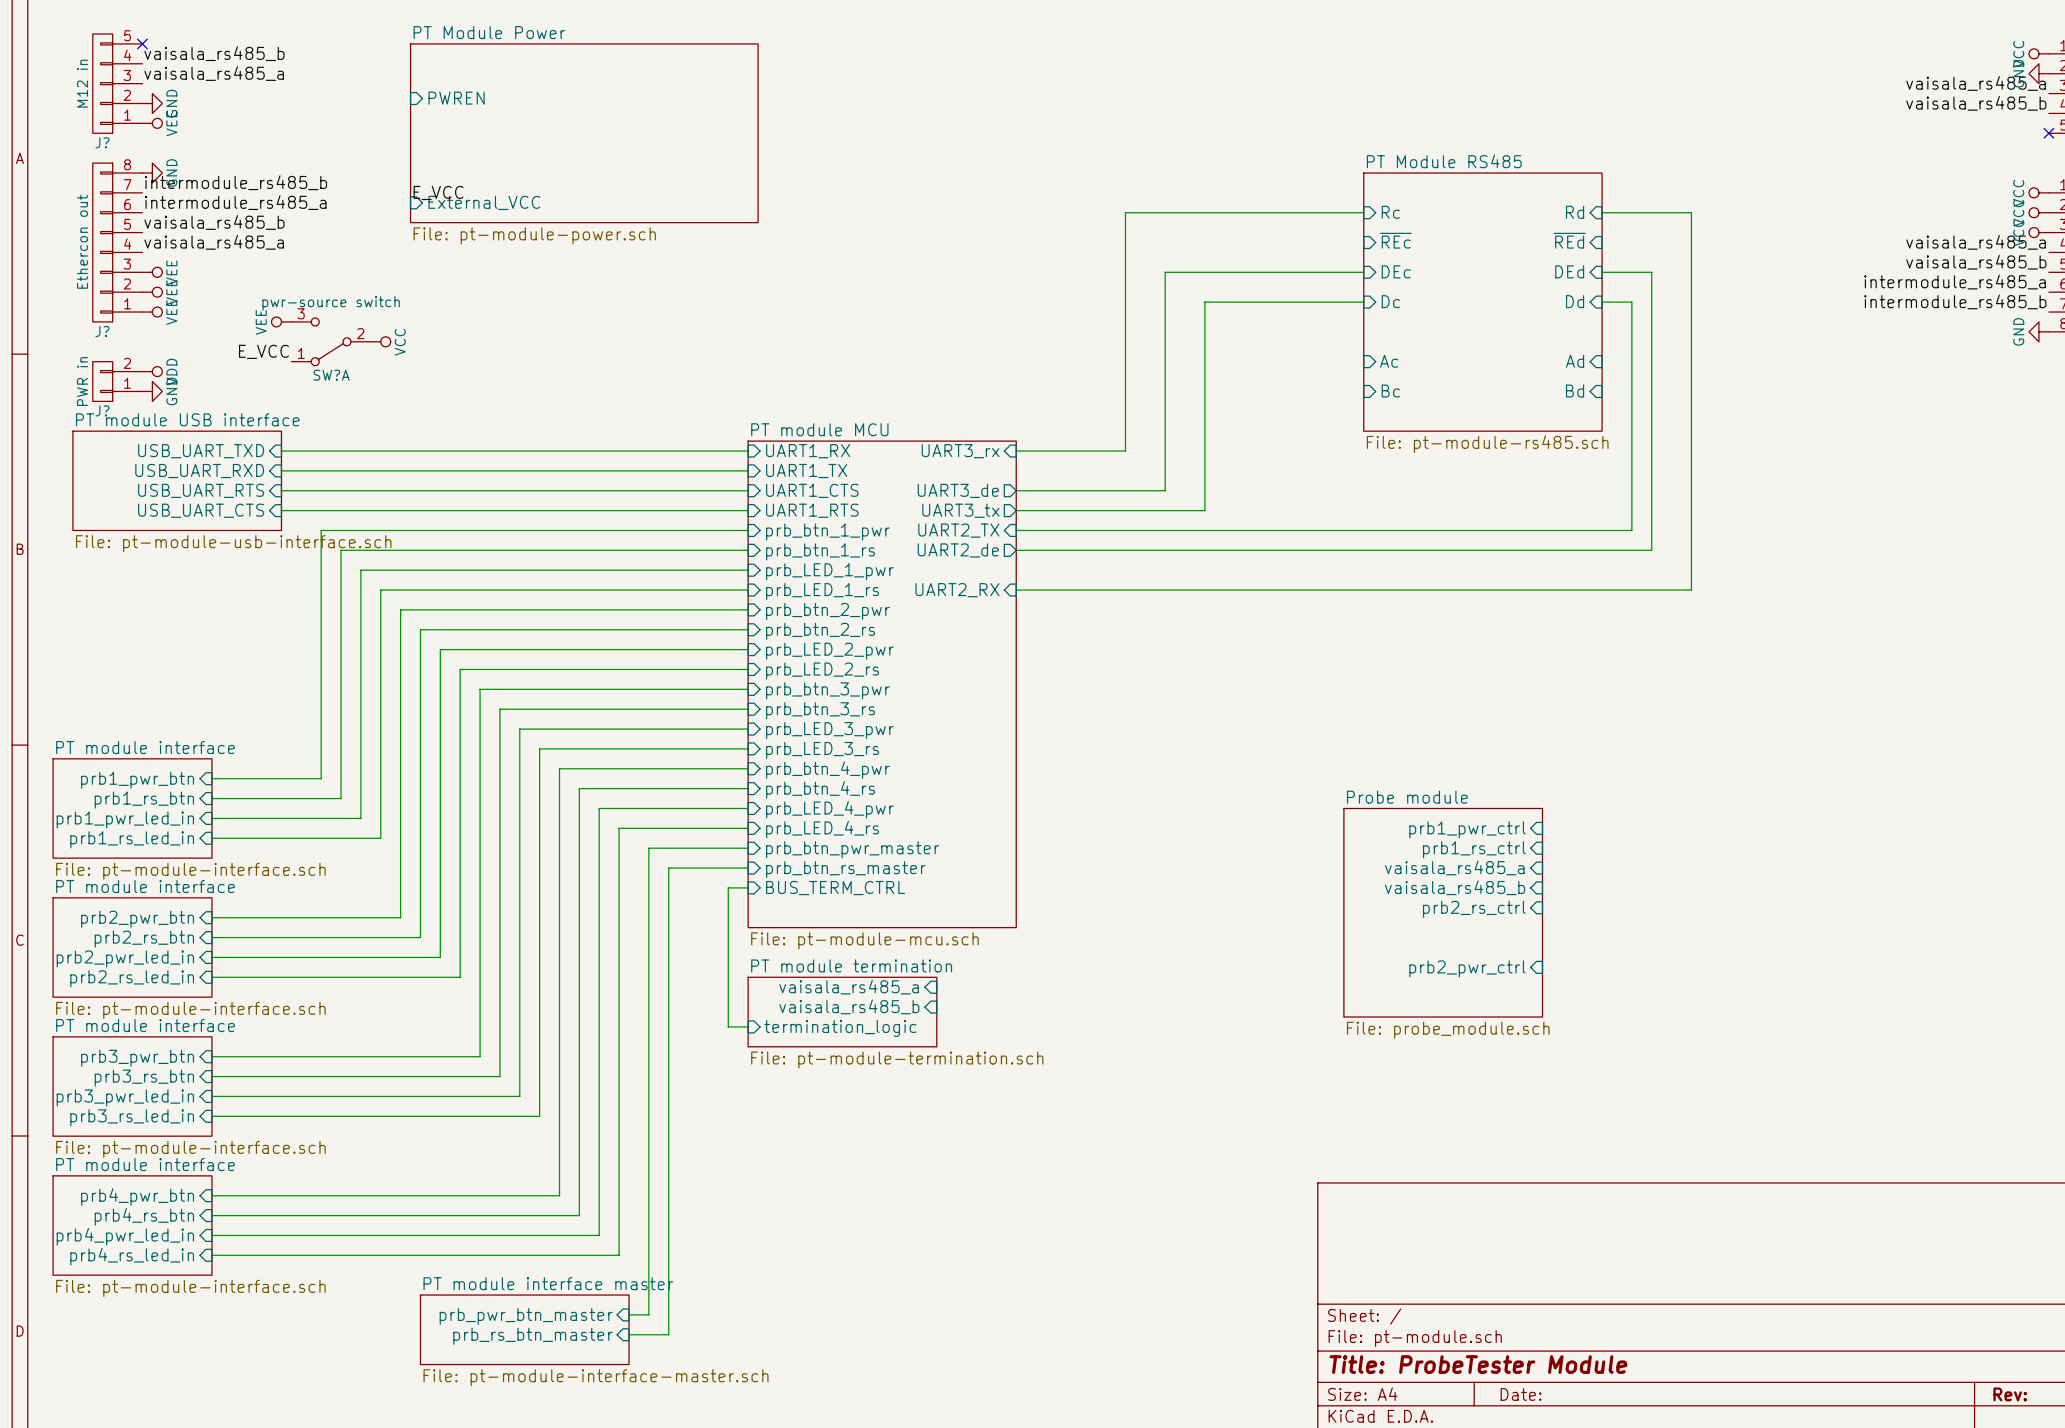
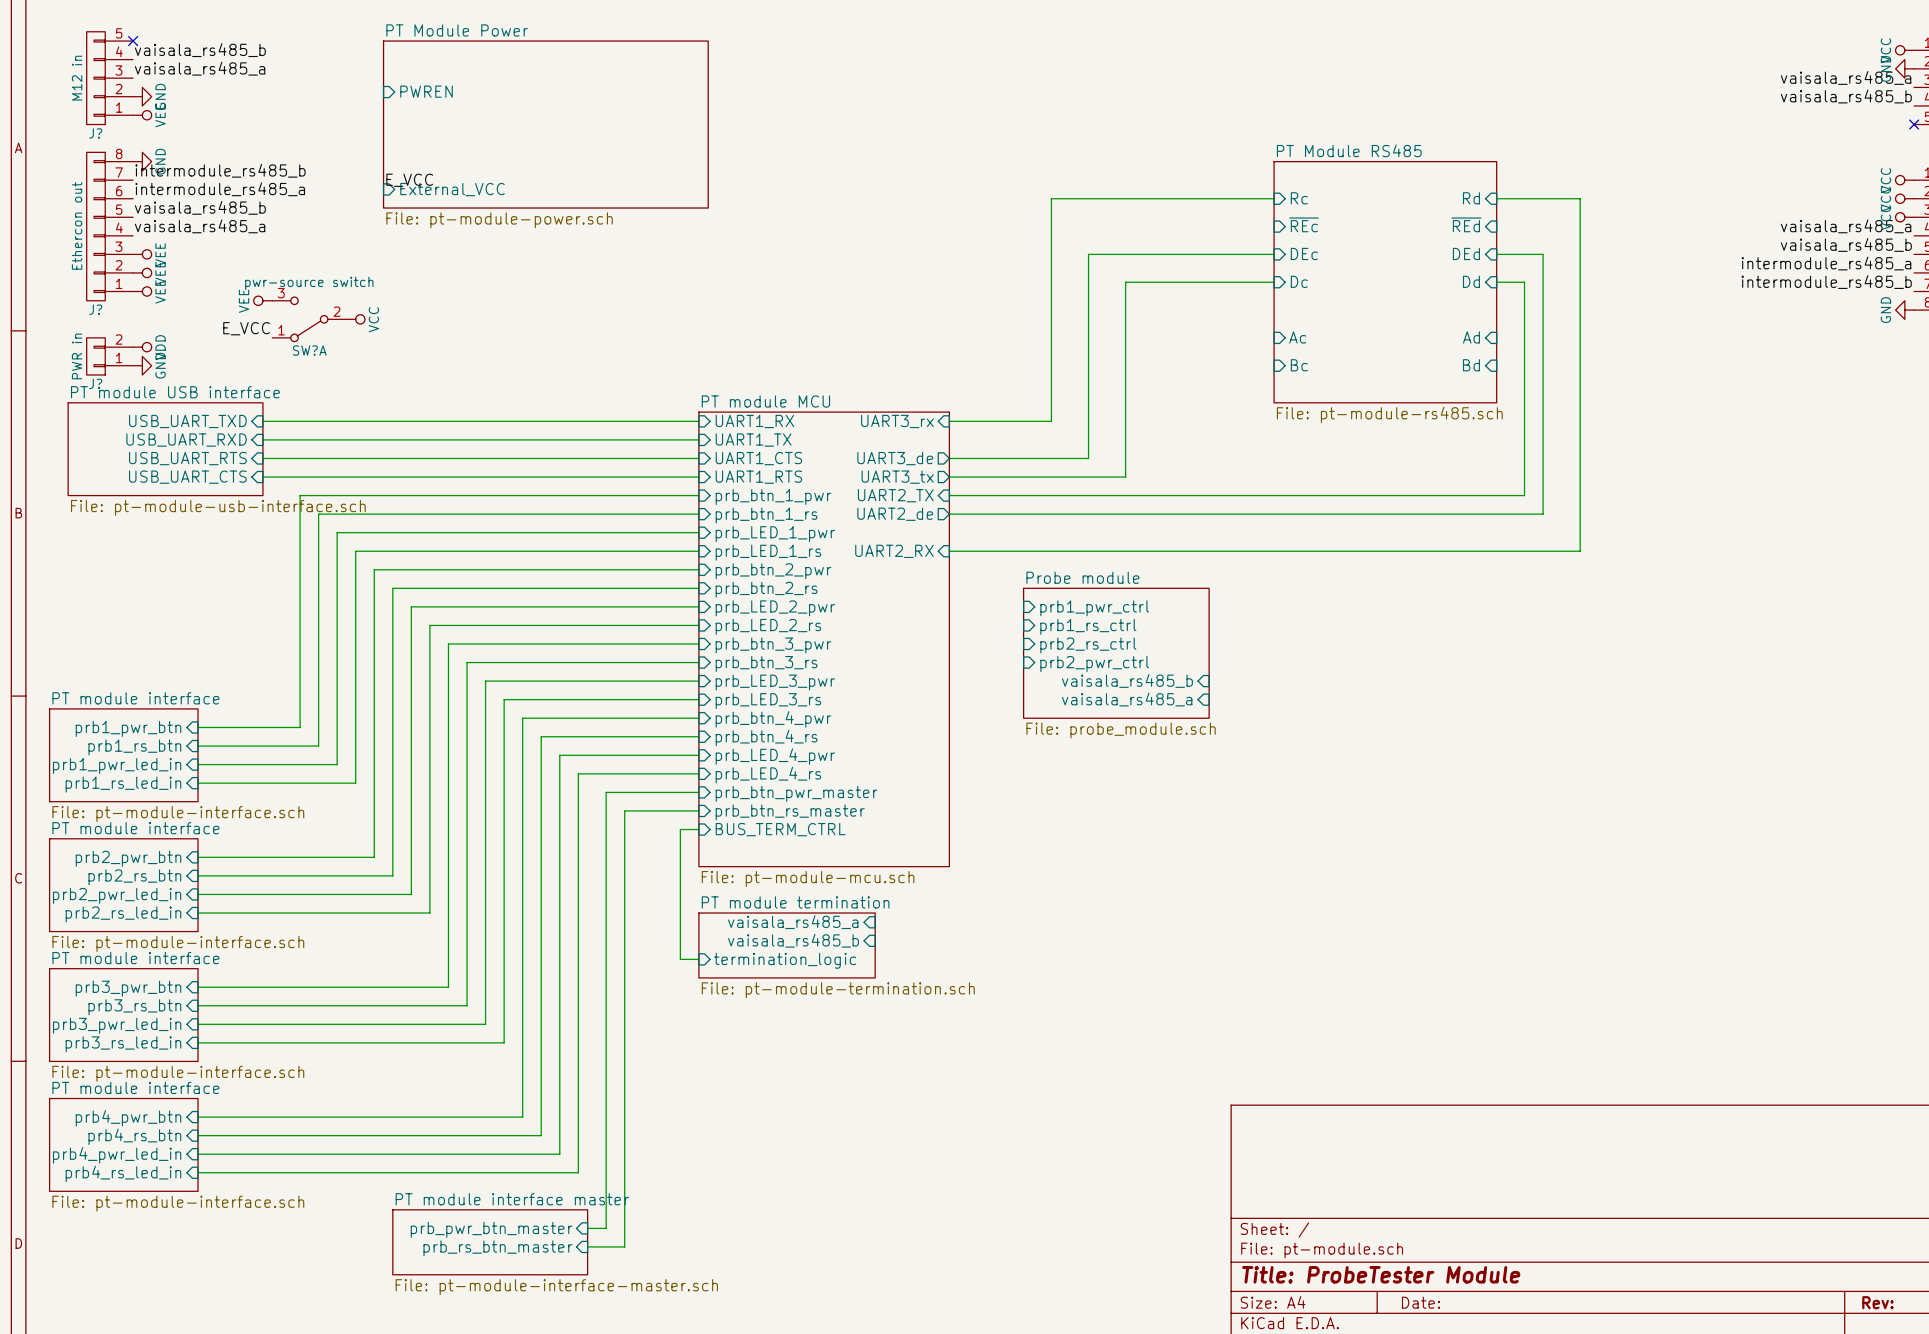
sheet pin: none -> prb1_pwr_ctrl (1094, 608)
sheet pin: none -> prb1_rs_ctrl (1088, 626)
sheet pin: none -> prb2_rs_ctrl (1088, 645)
sheet Probe module: none -> File: probe_module.sch (1116, 653)
sheet pin: none -> prb2_pwr_ctrl (1094, 663)
sheet pin: none -> vaisala_rs485_b (1127, 680)
sheet pin: none -> vaisala_rs485_a (1127, 699)
sheet pin: prb1_pwr_ctrl (1467, 829) -> none
sheet pin: prb1_rs_ctrl (1474, 849) -> none
sheet pin: vaisala_rs485_a (1454, 867) -> none
sheet pin: vaisala_rs485_b (1455, 887) -> none
sheet pin: prb2_rs_ctrl (1474, 909) -> none
sheet Probe module: File: probe_module.sch (1443, 912) -> none
sheet pin: prb2_pwr_ctrl (1467, 968) -> none

